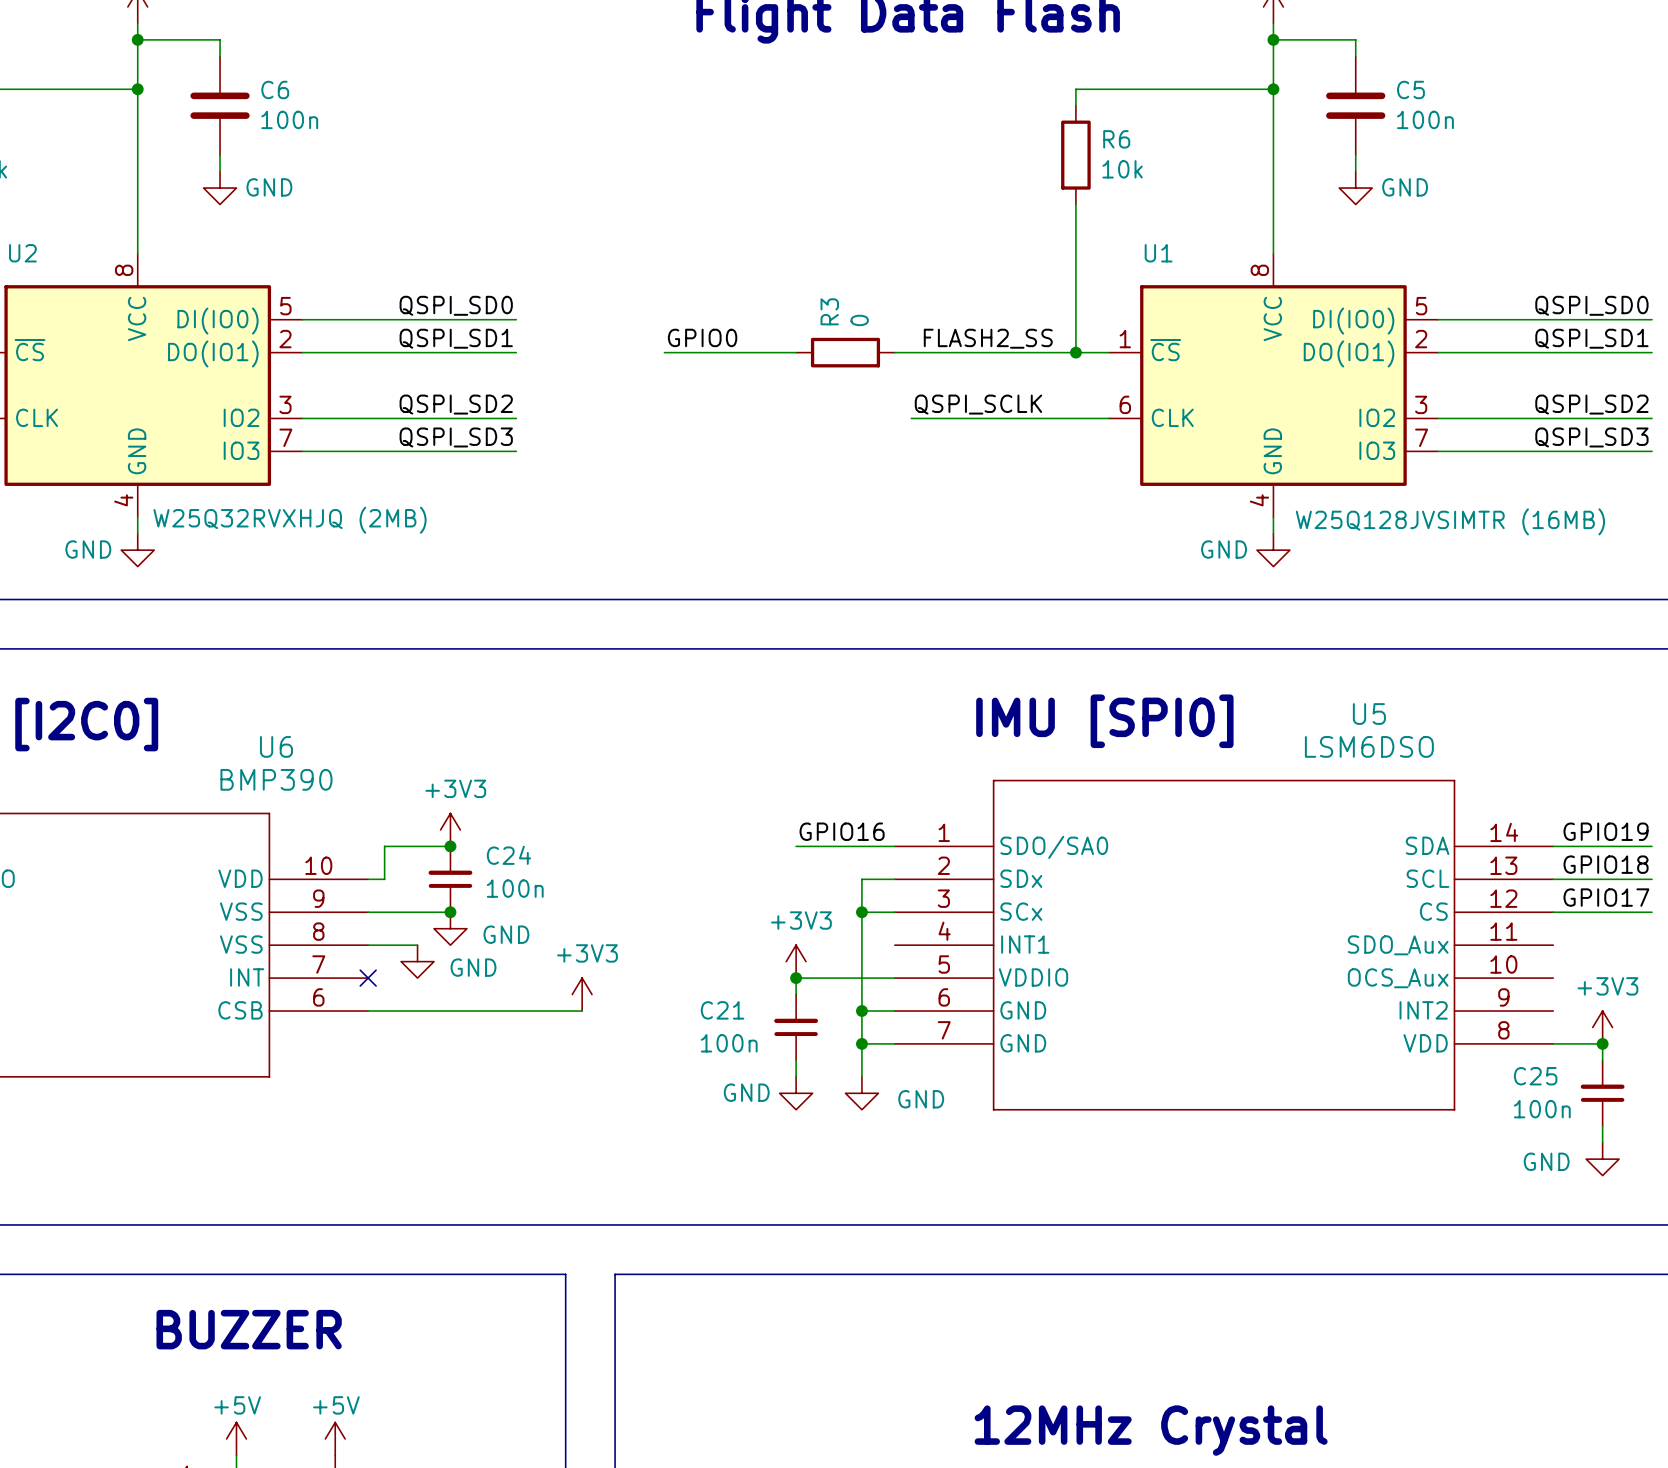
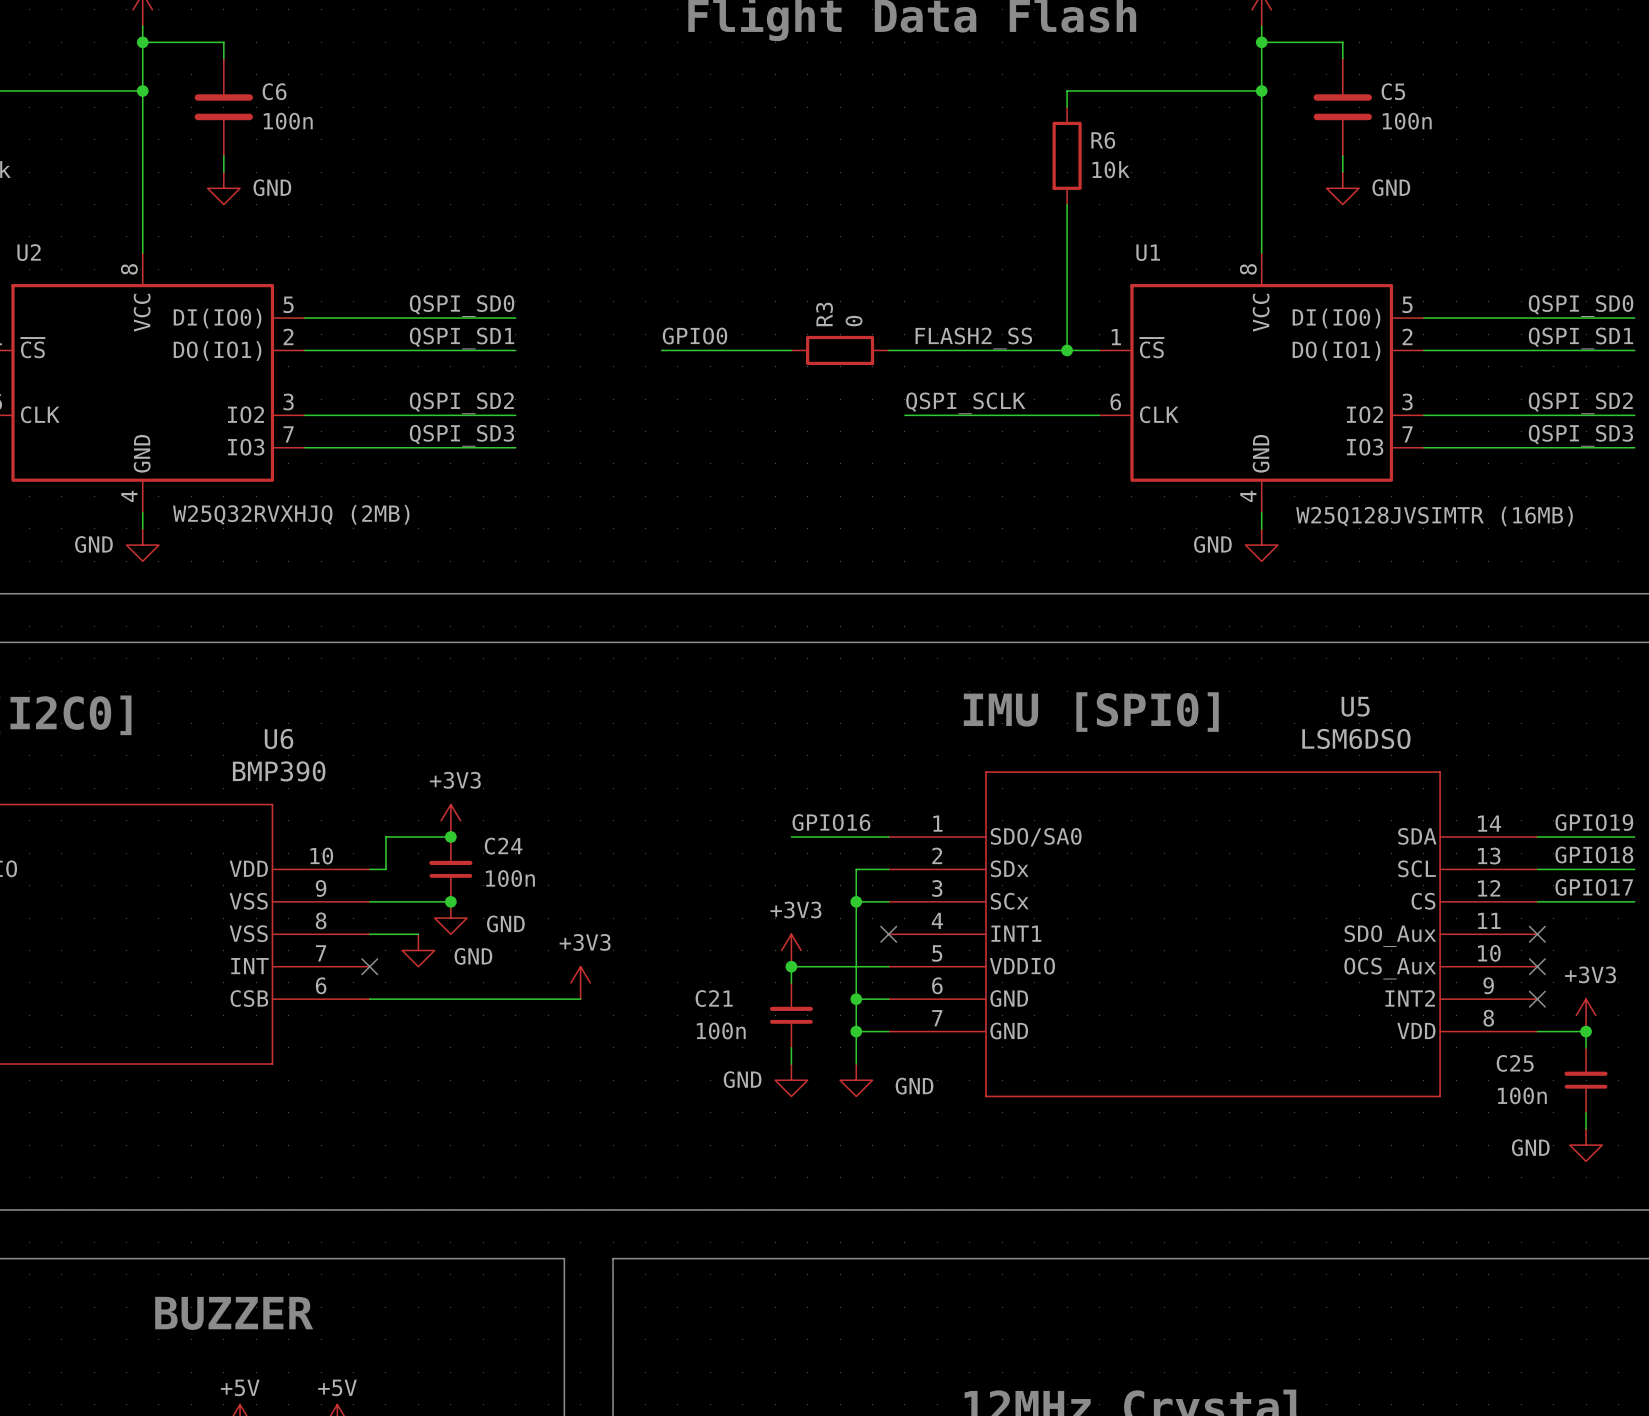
no-connect mark: none -> (888, 934)
no-connect mark: none -> (1537, 934)
no-connect mark: none -> (1537, 966)
no-connect mark: none -> (1537, 999)

